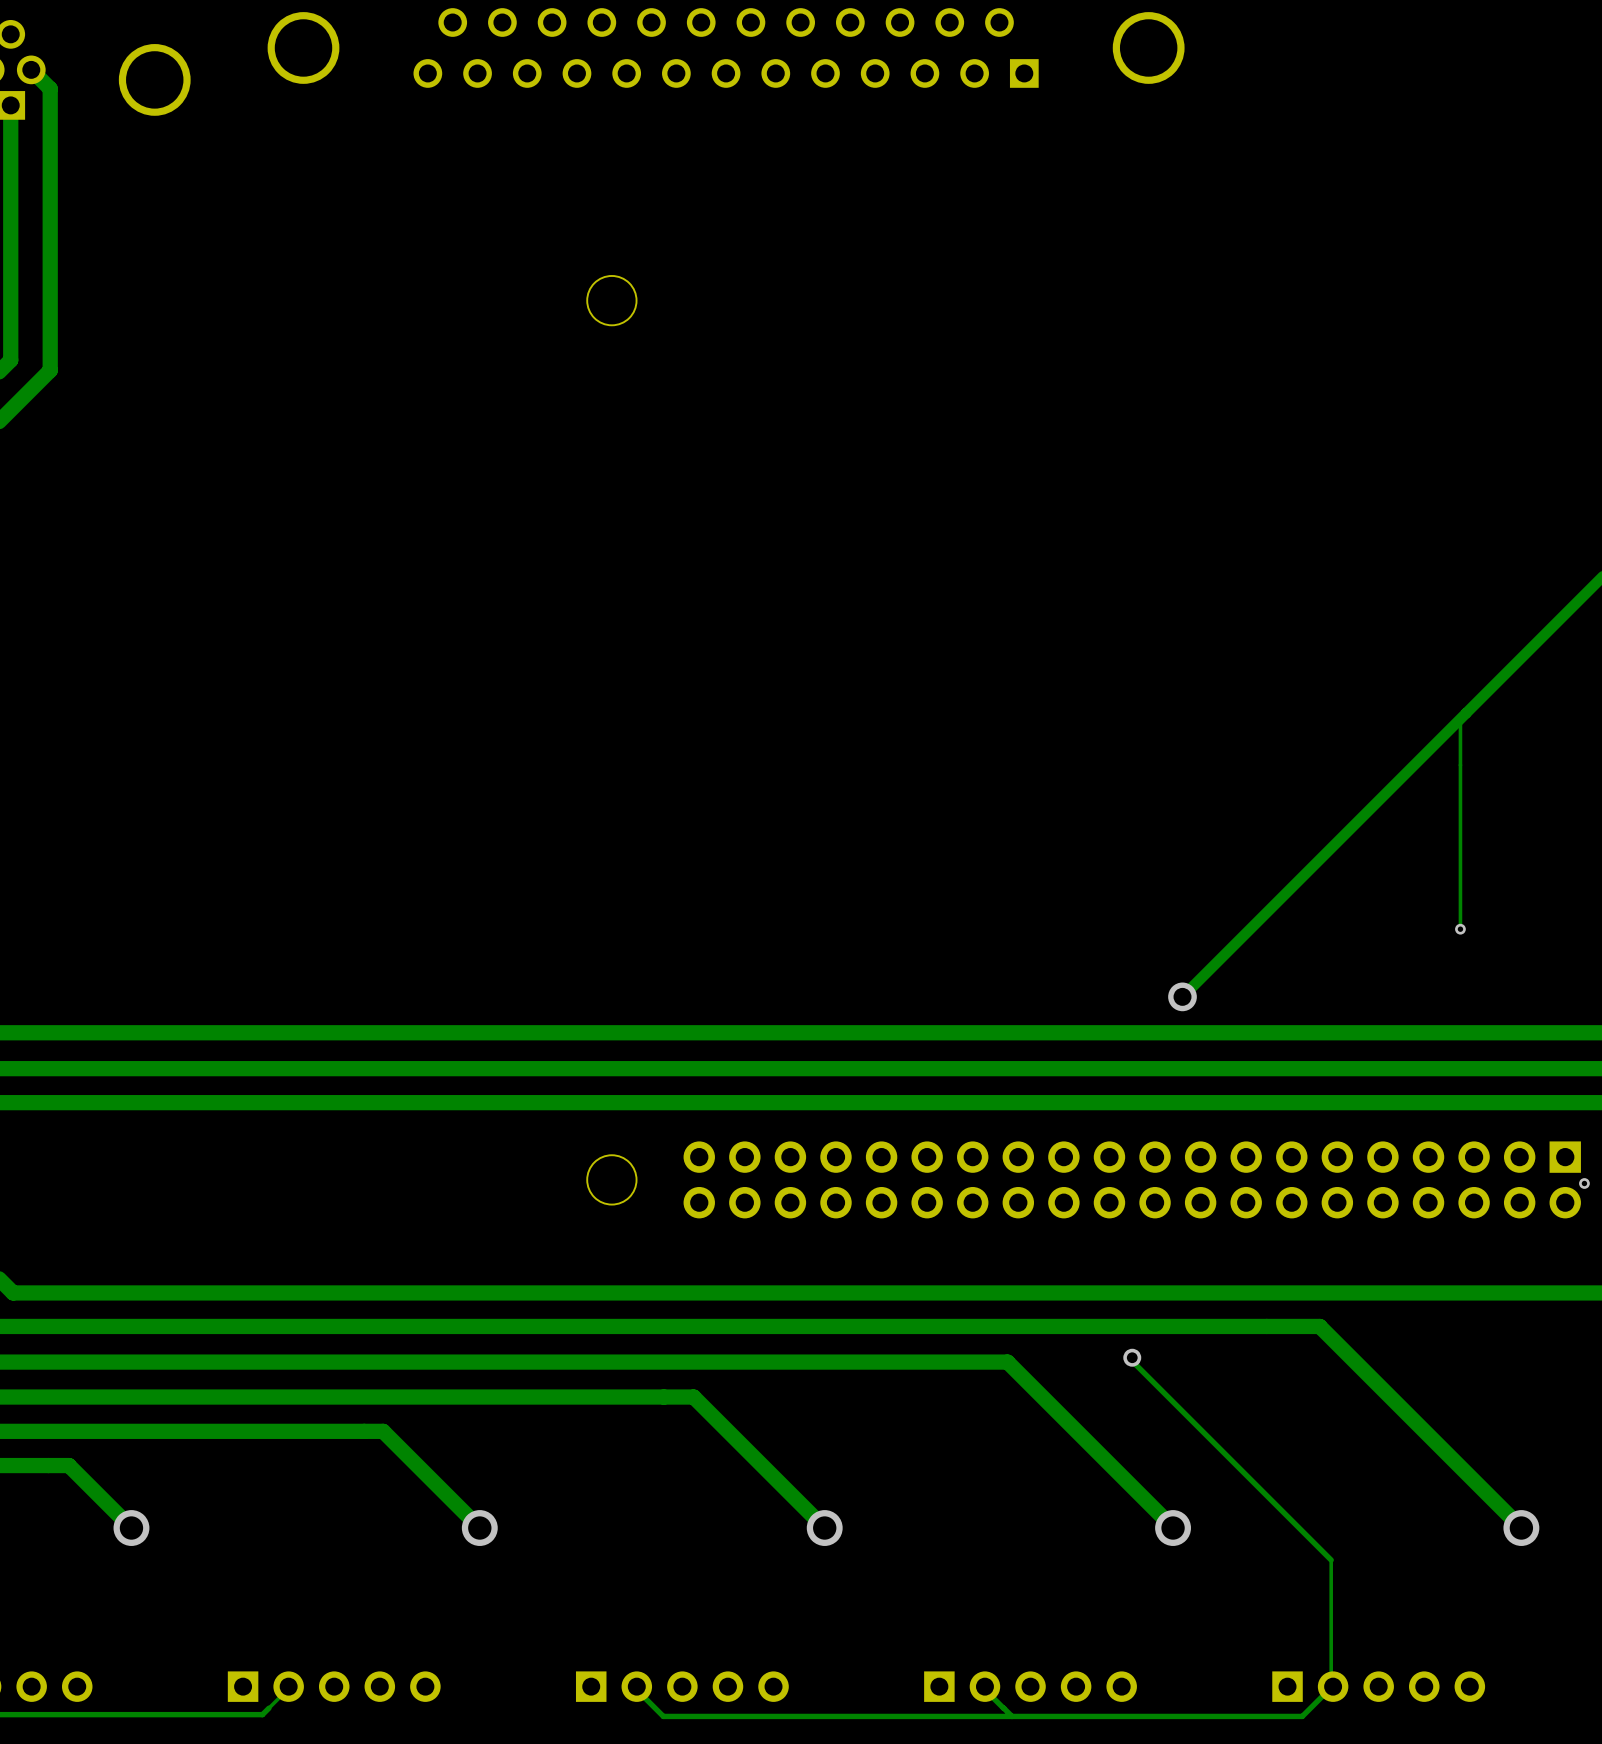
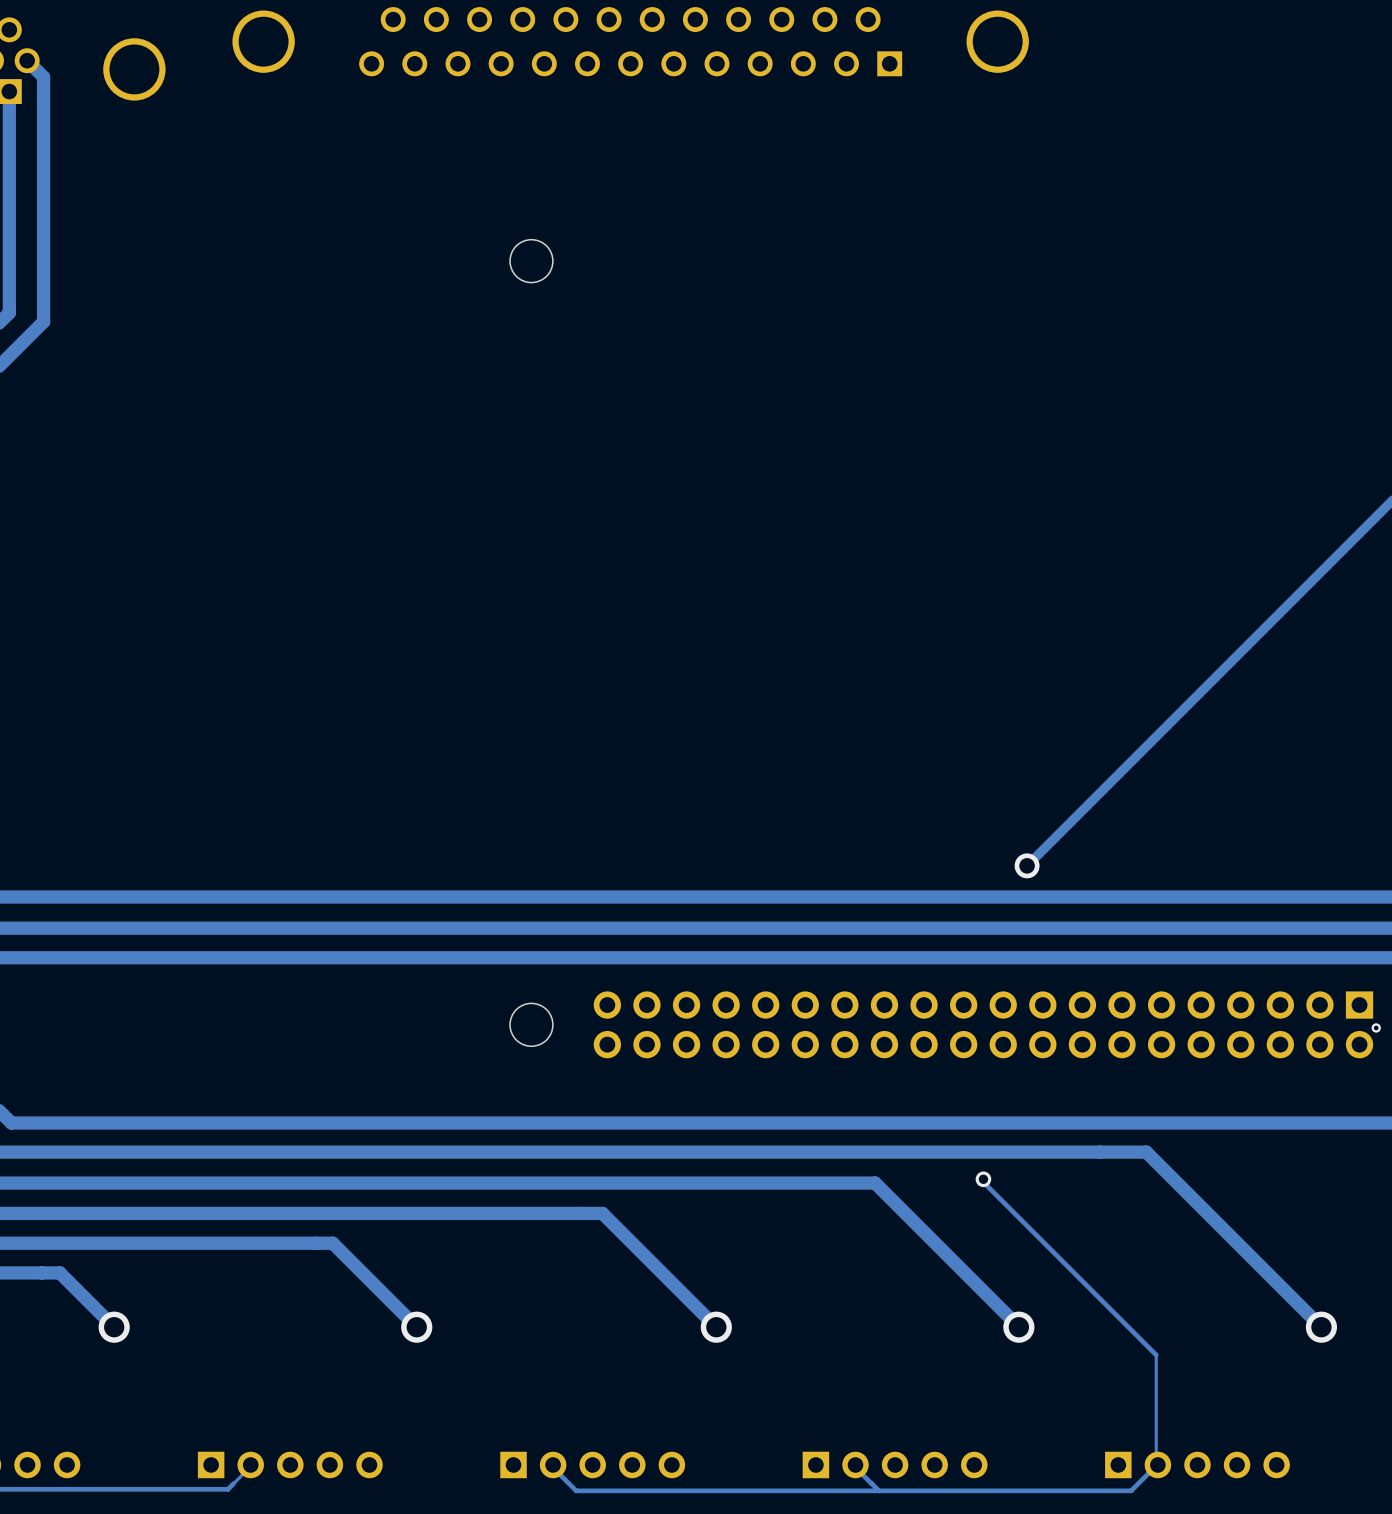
track: (1466, 713) (1460, 718) (1460, 929) -> none
via: (1460, 929) -> none

